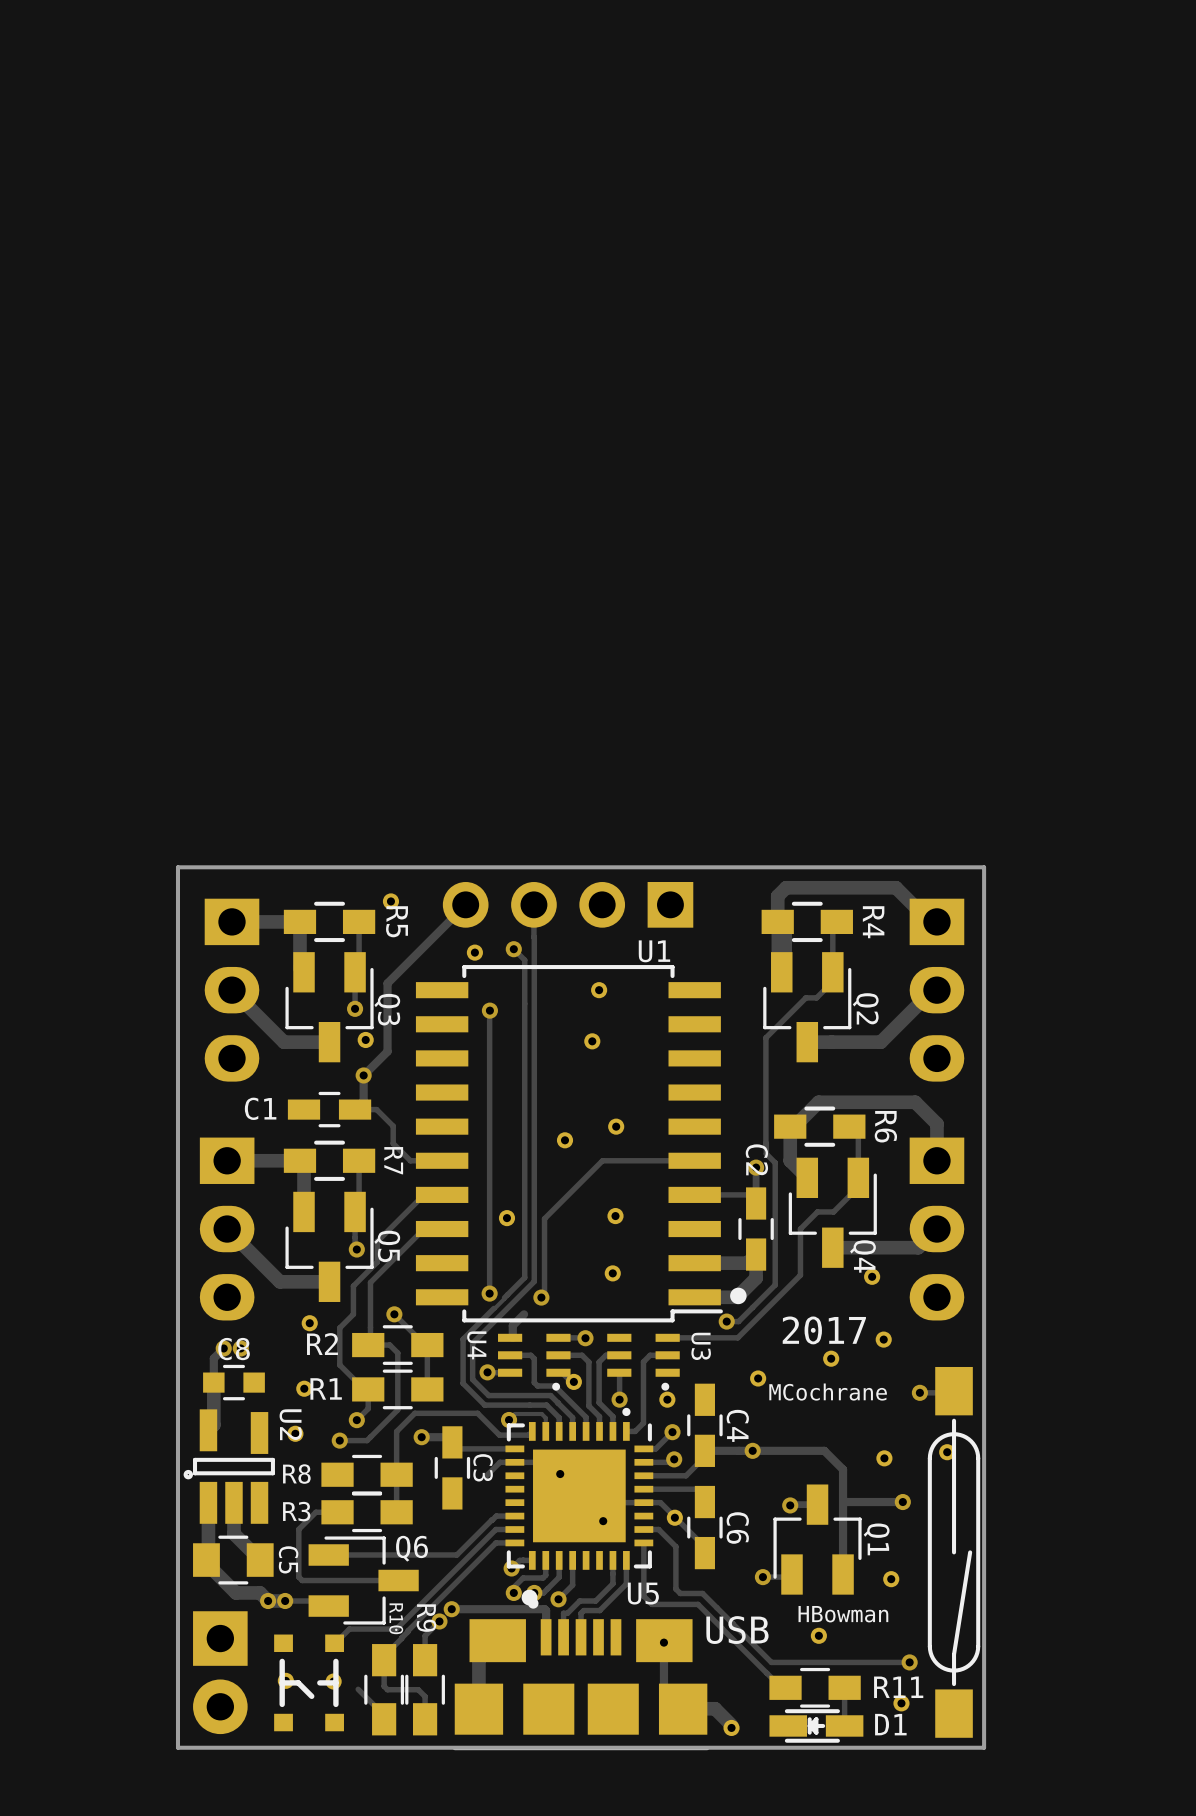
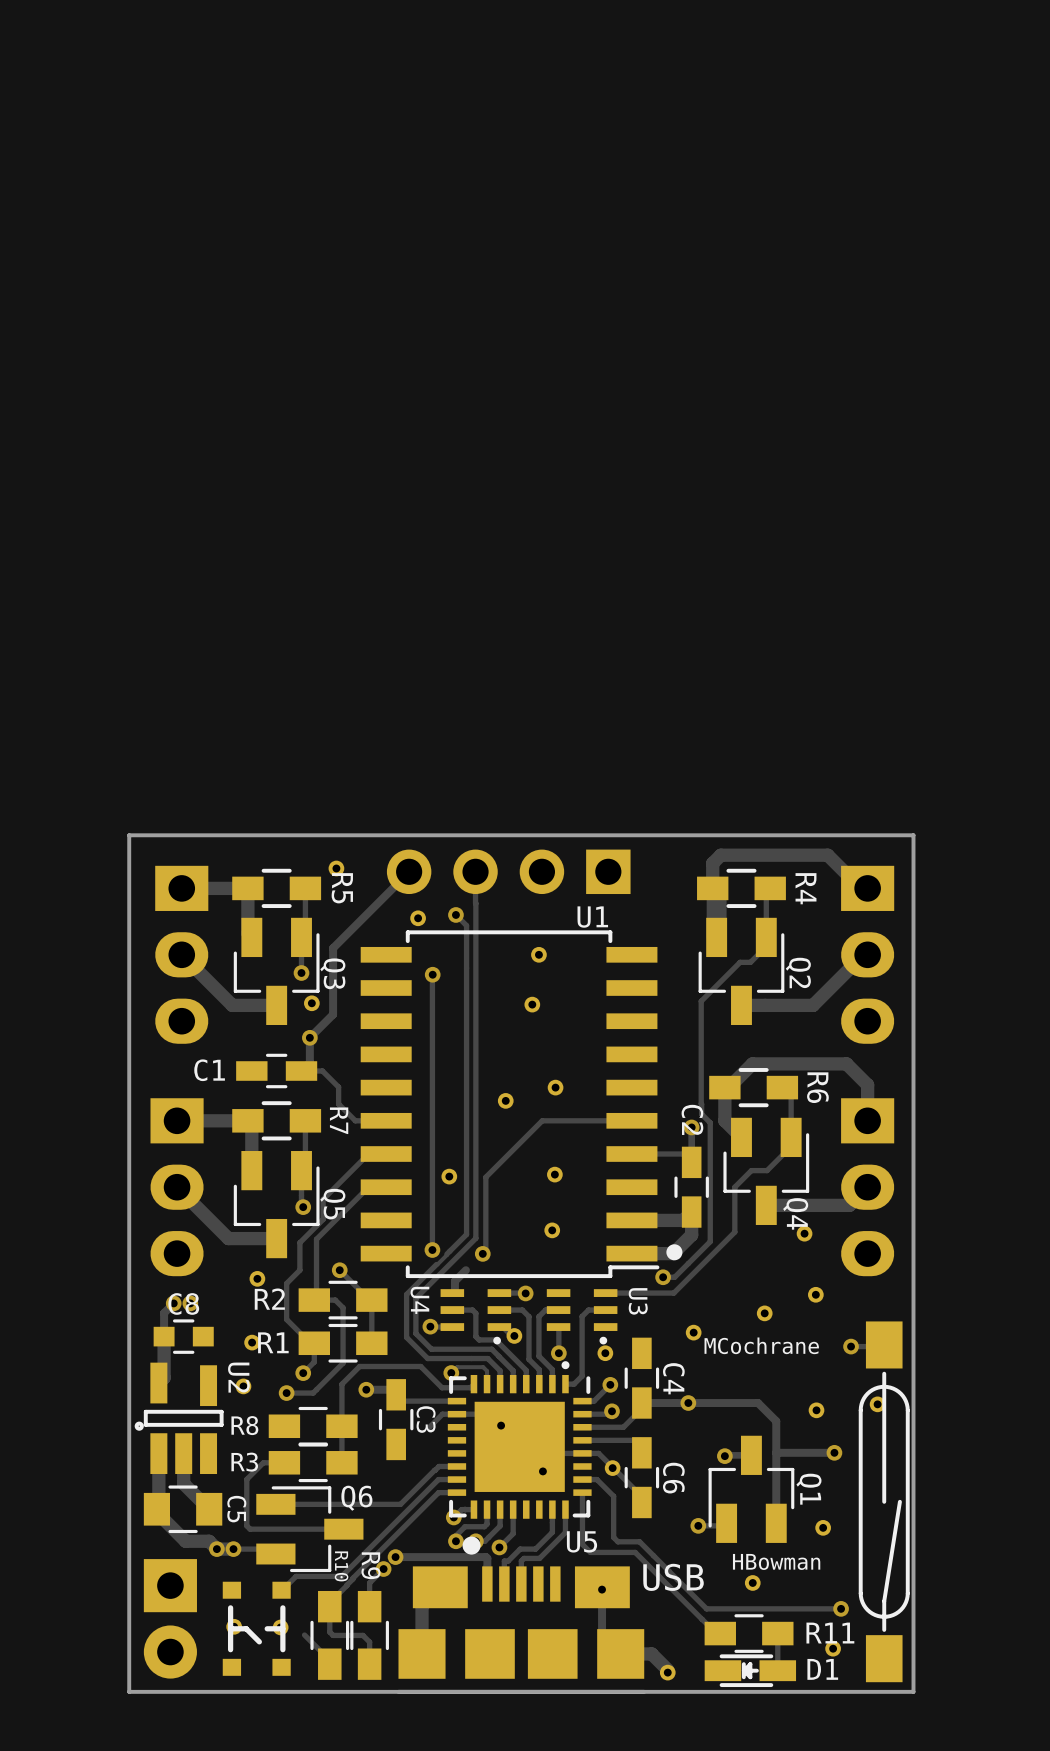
text: 2017 (824, 1330) -> none
part footprint: [452, 1598, 710, 1751] -> [396, 1536, 647, 1694]

